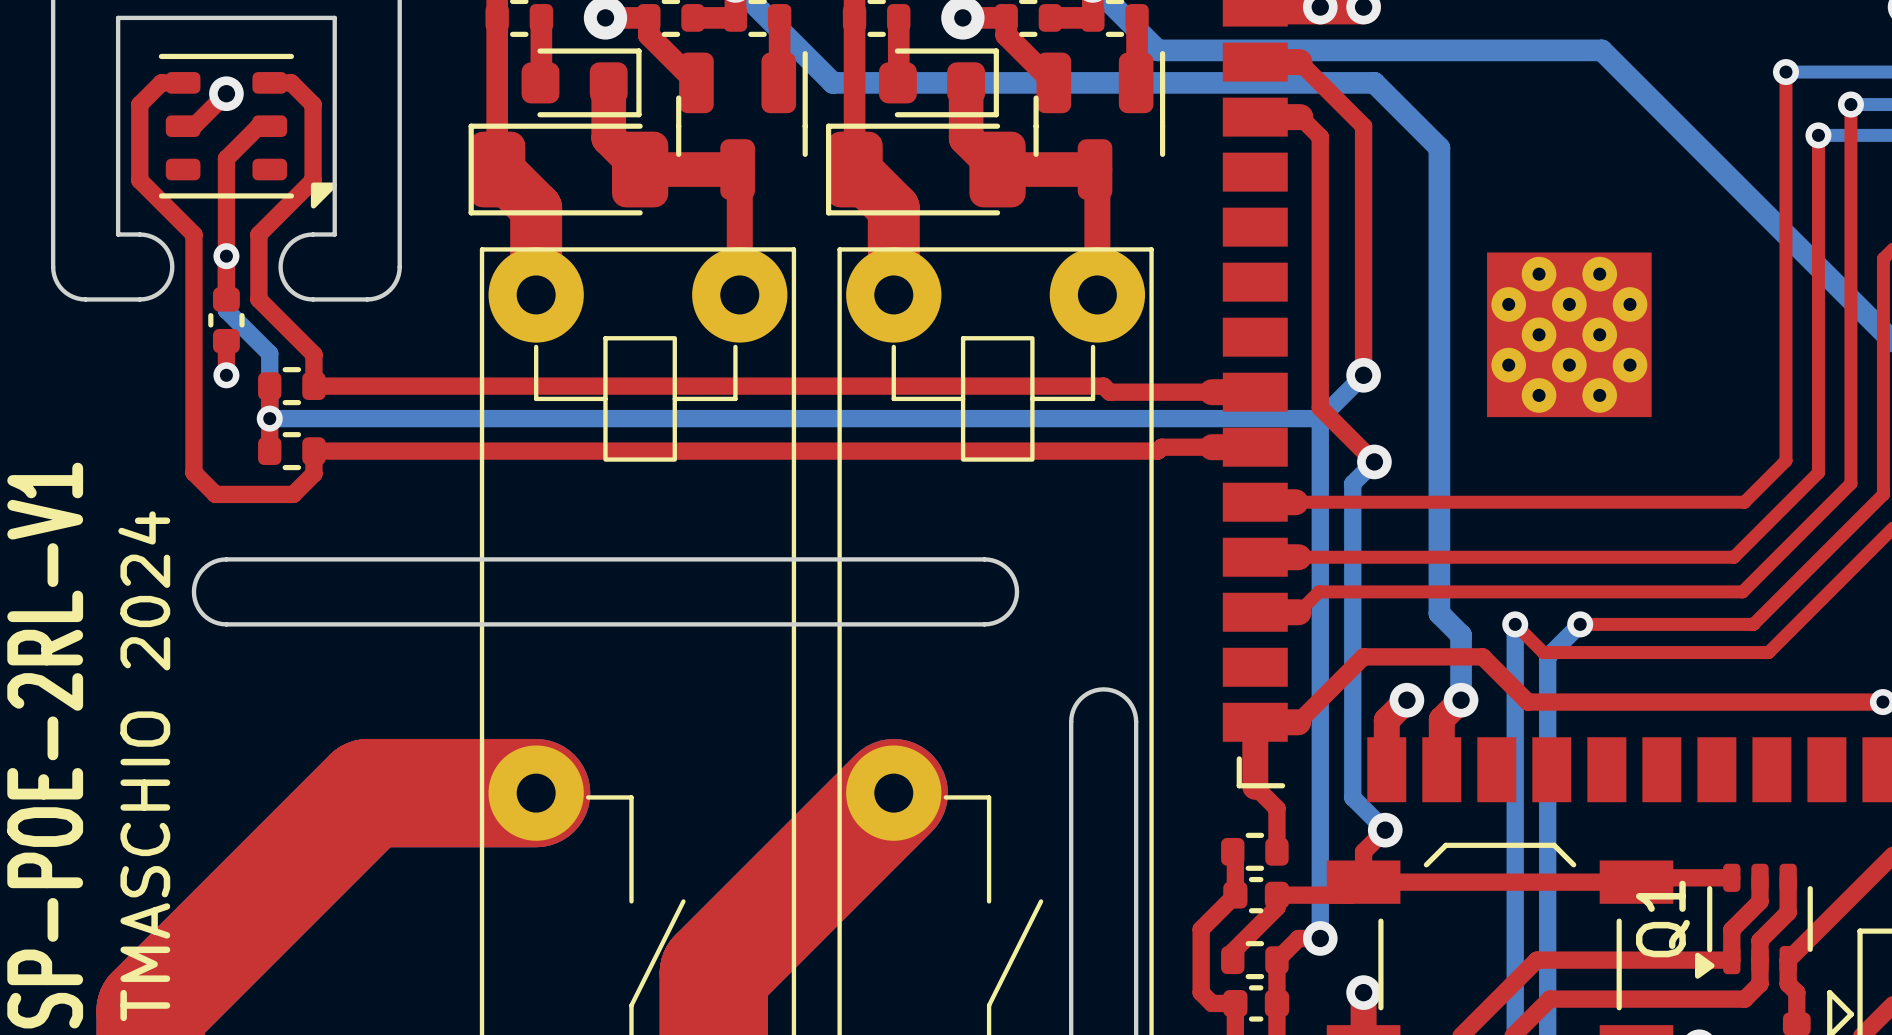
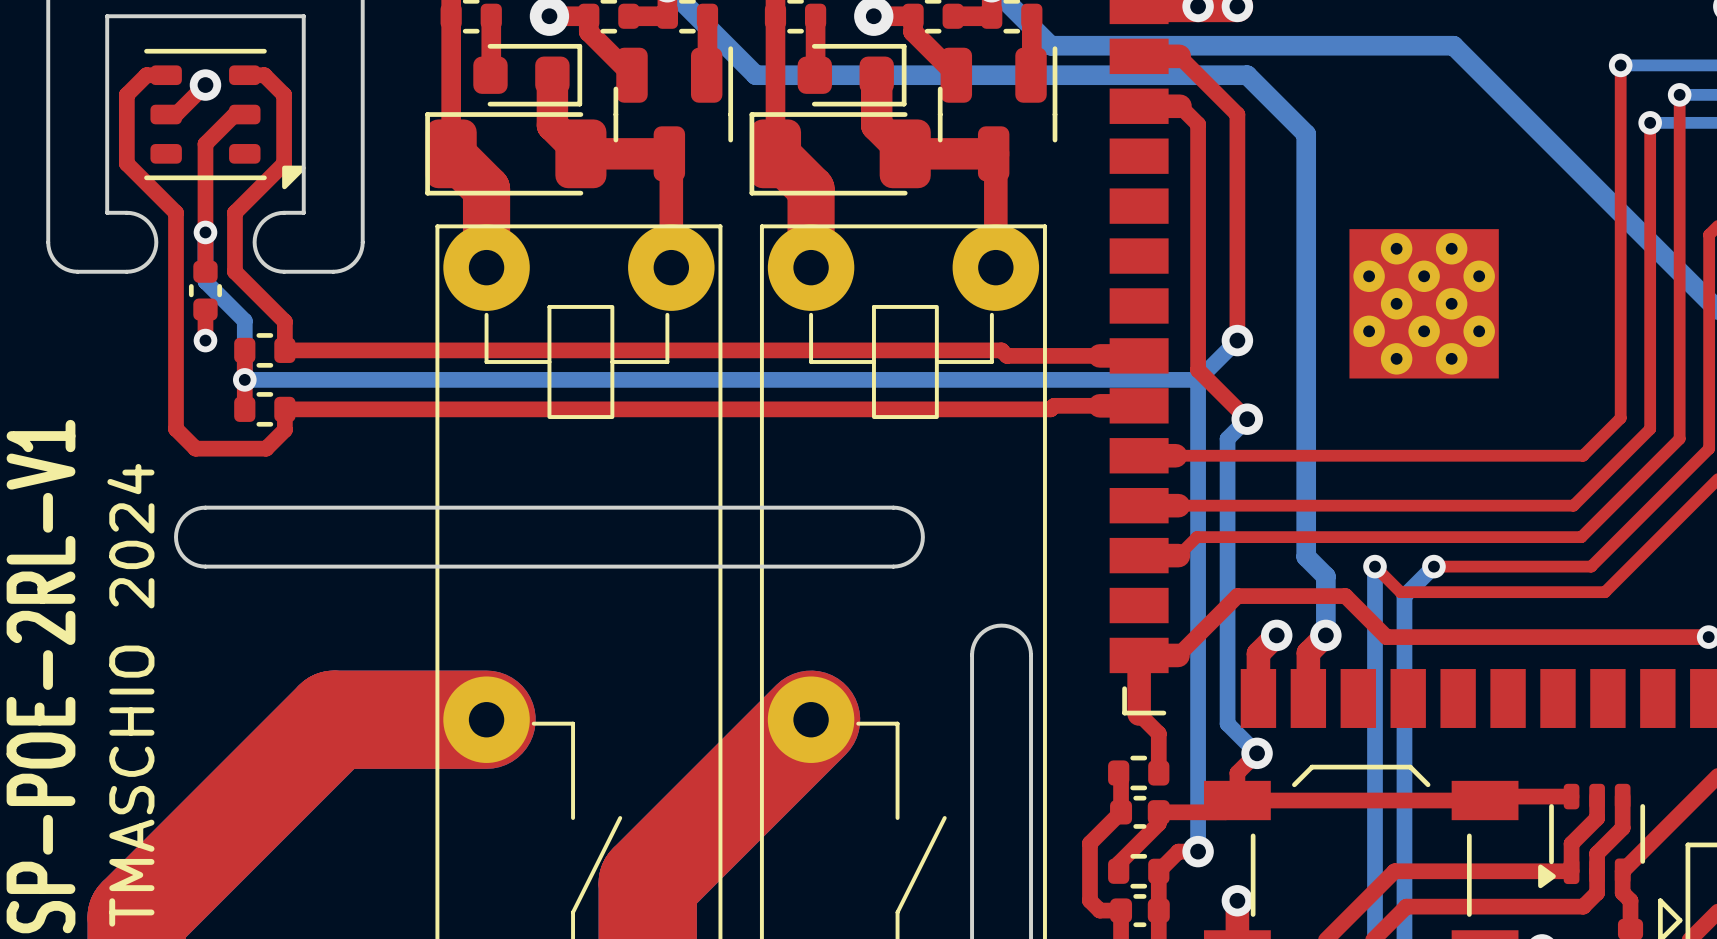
Q1 name: Q1 (1662, 918) -> none

